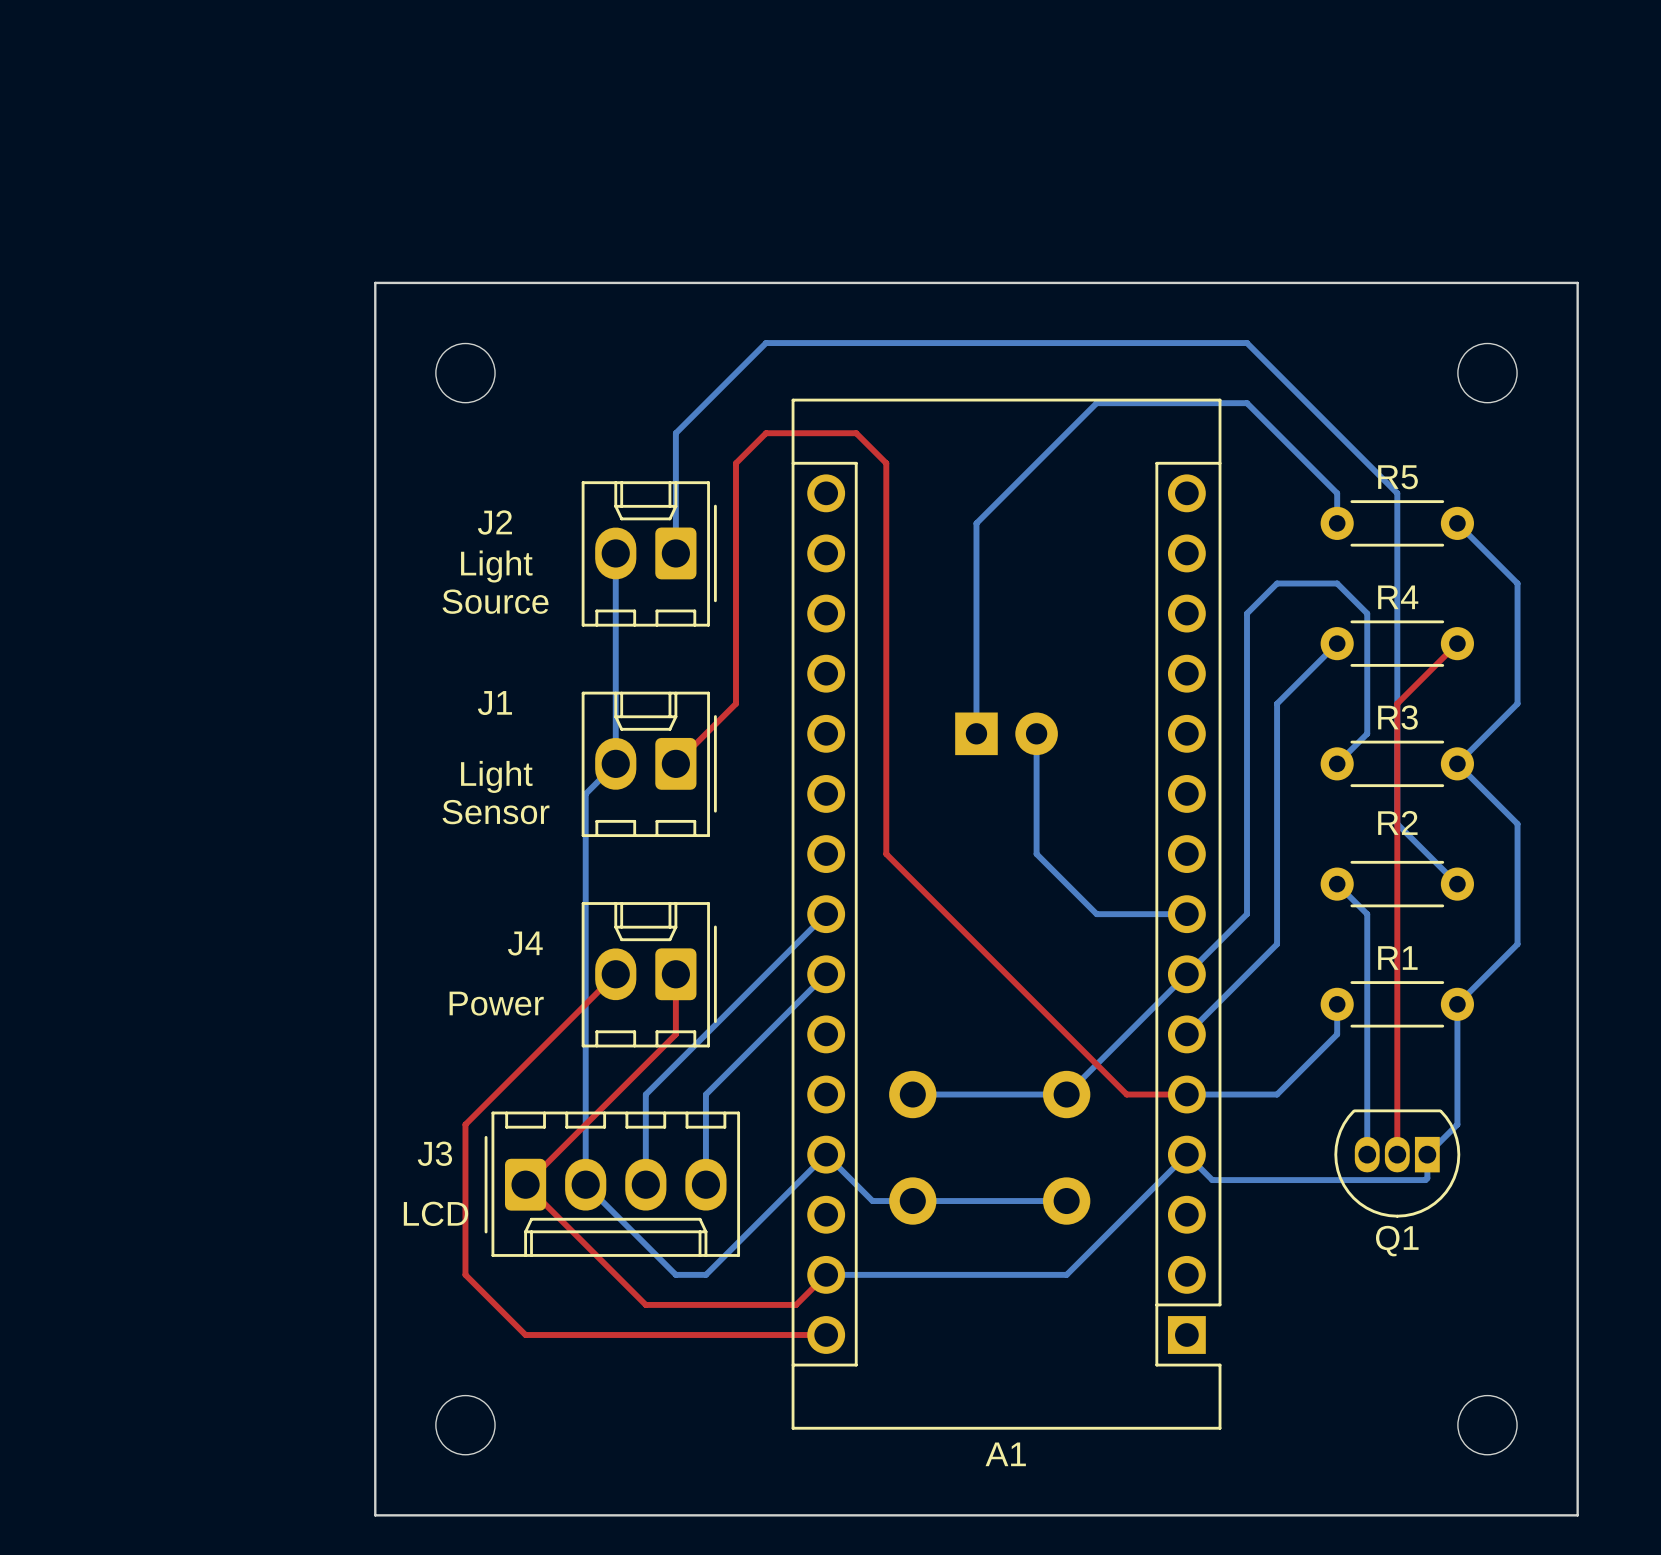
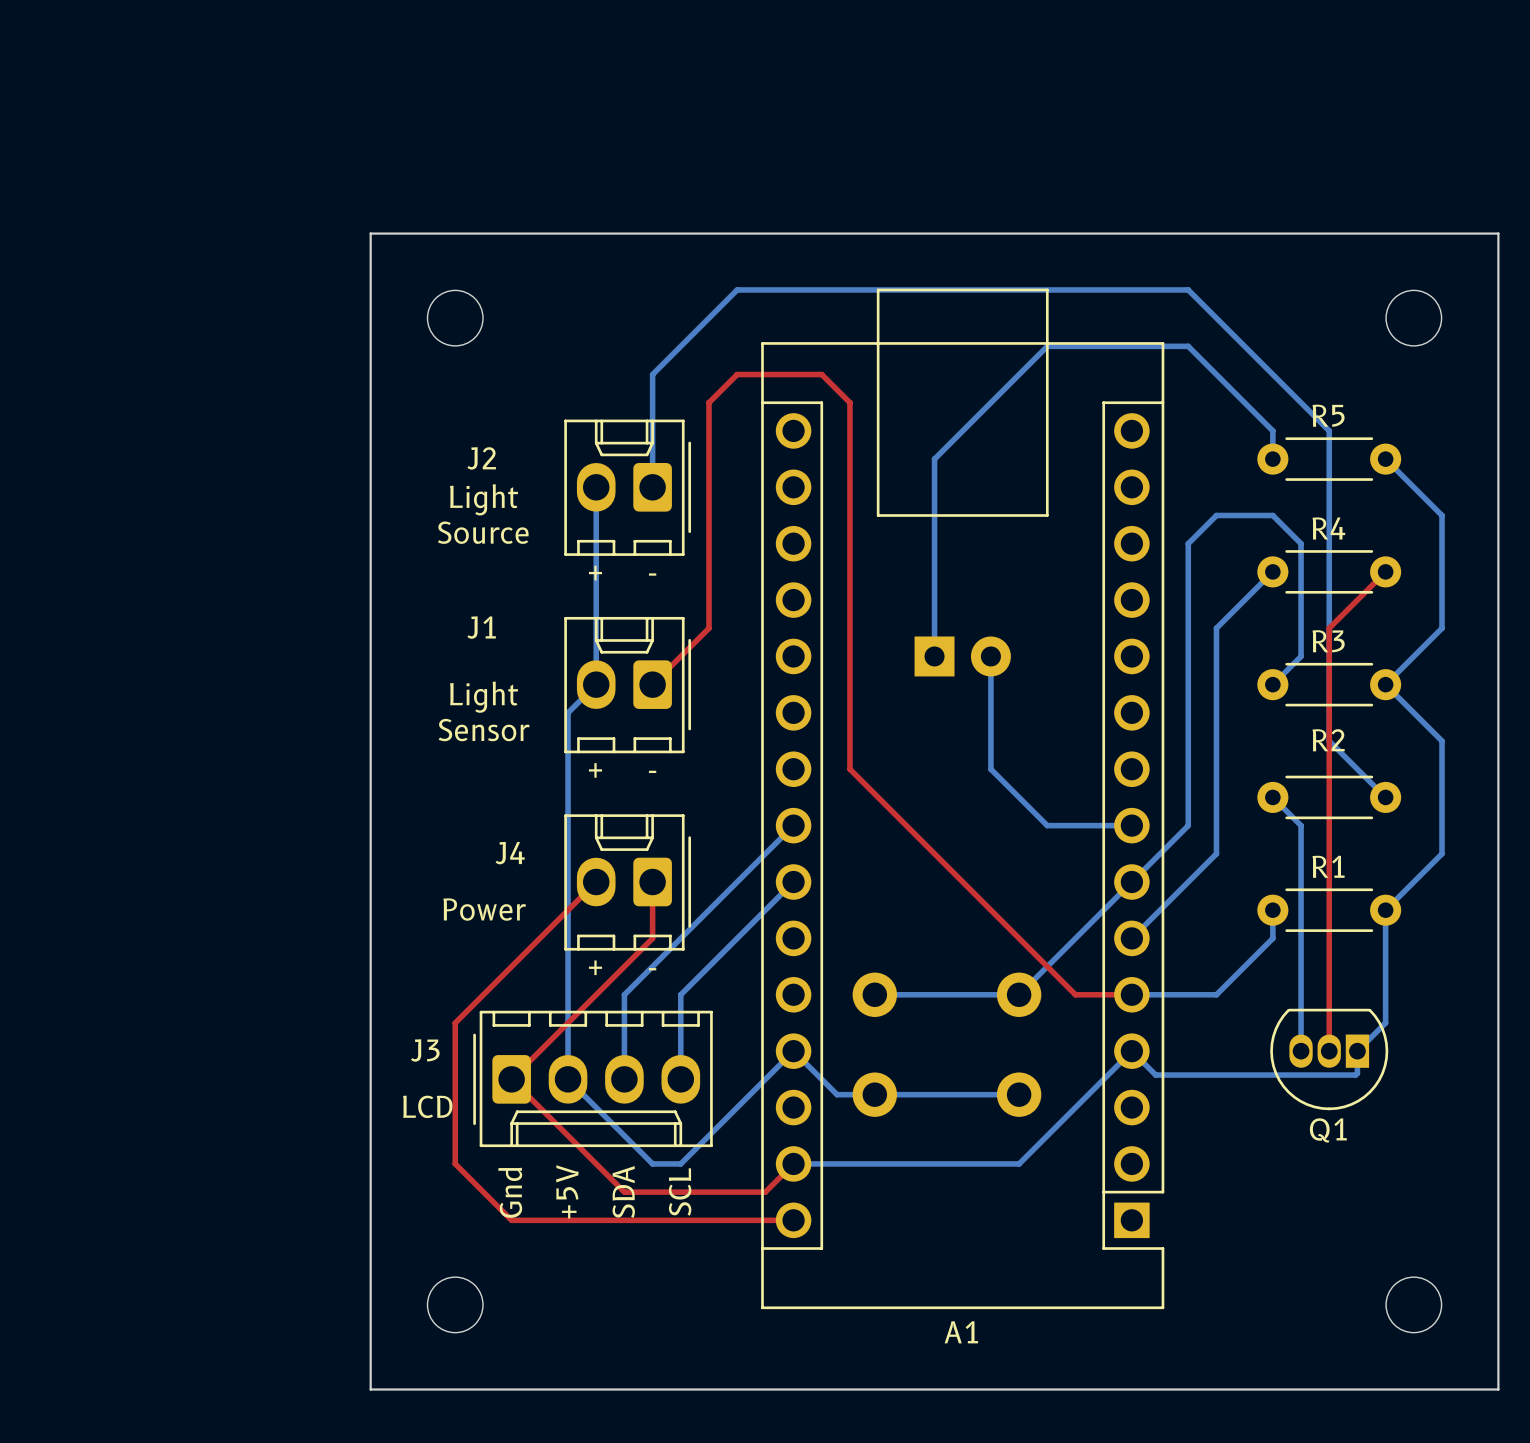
line: none -> (878, 289) (1047, 289) (1047, 515) (878, 515) (878, 289)
text: none -> + (595, 573)
text: none -> - (652, 574)
text: none -> + (595, 770)
text: none -> - (652, 771)
text: none -> + (595, 967)
text: none -> - (652, 969)
text: none -> +5V (567, 1191)
text: none -> SDA (623, 1192)
text: none -> SCL (680, 1191)
text: none -> Gnd (510, 1192)

